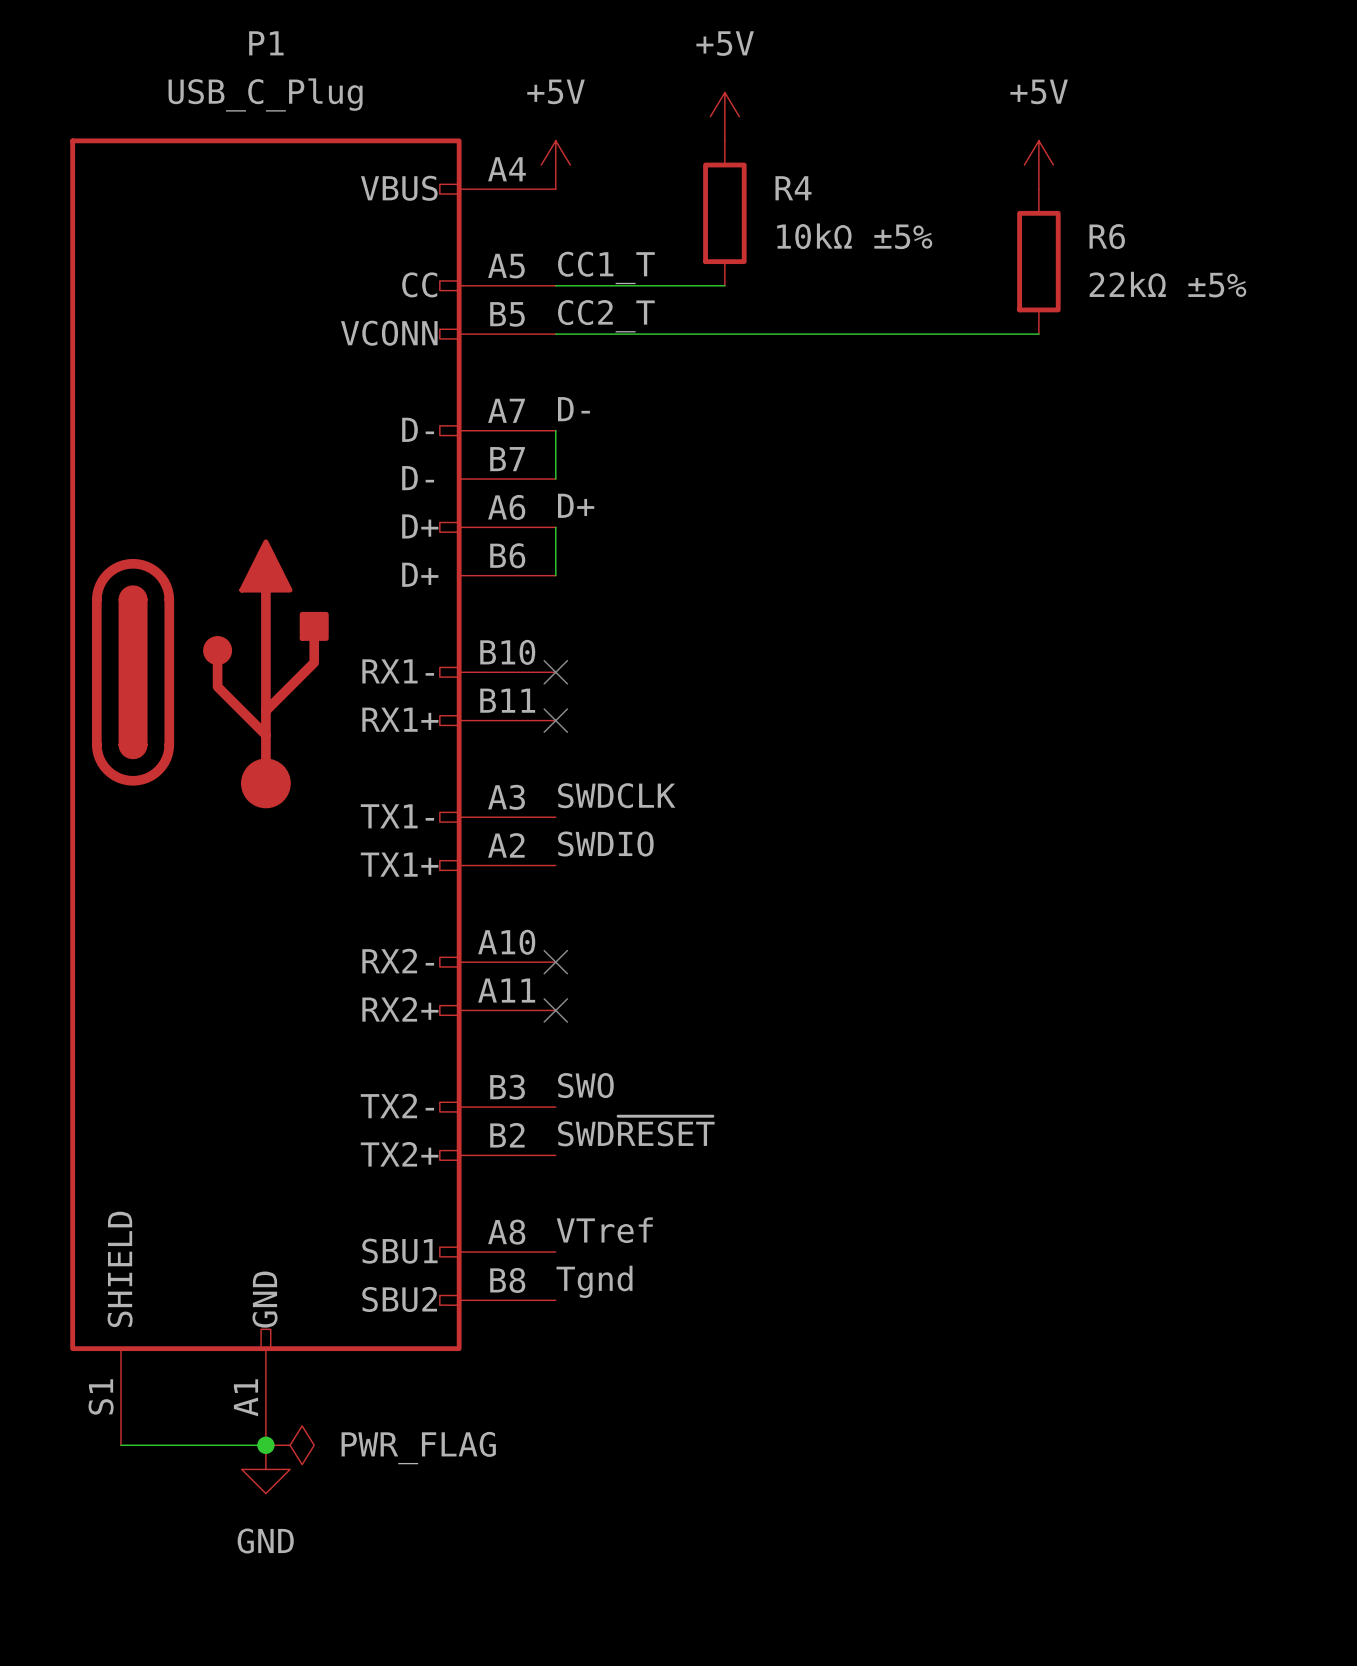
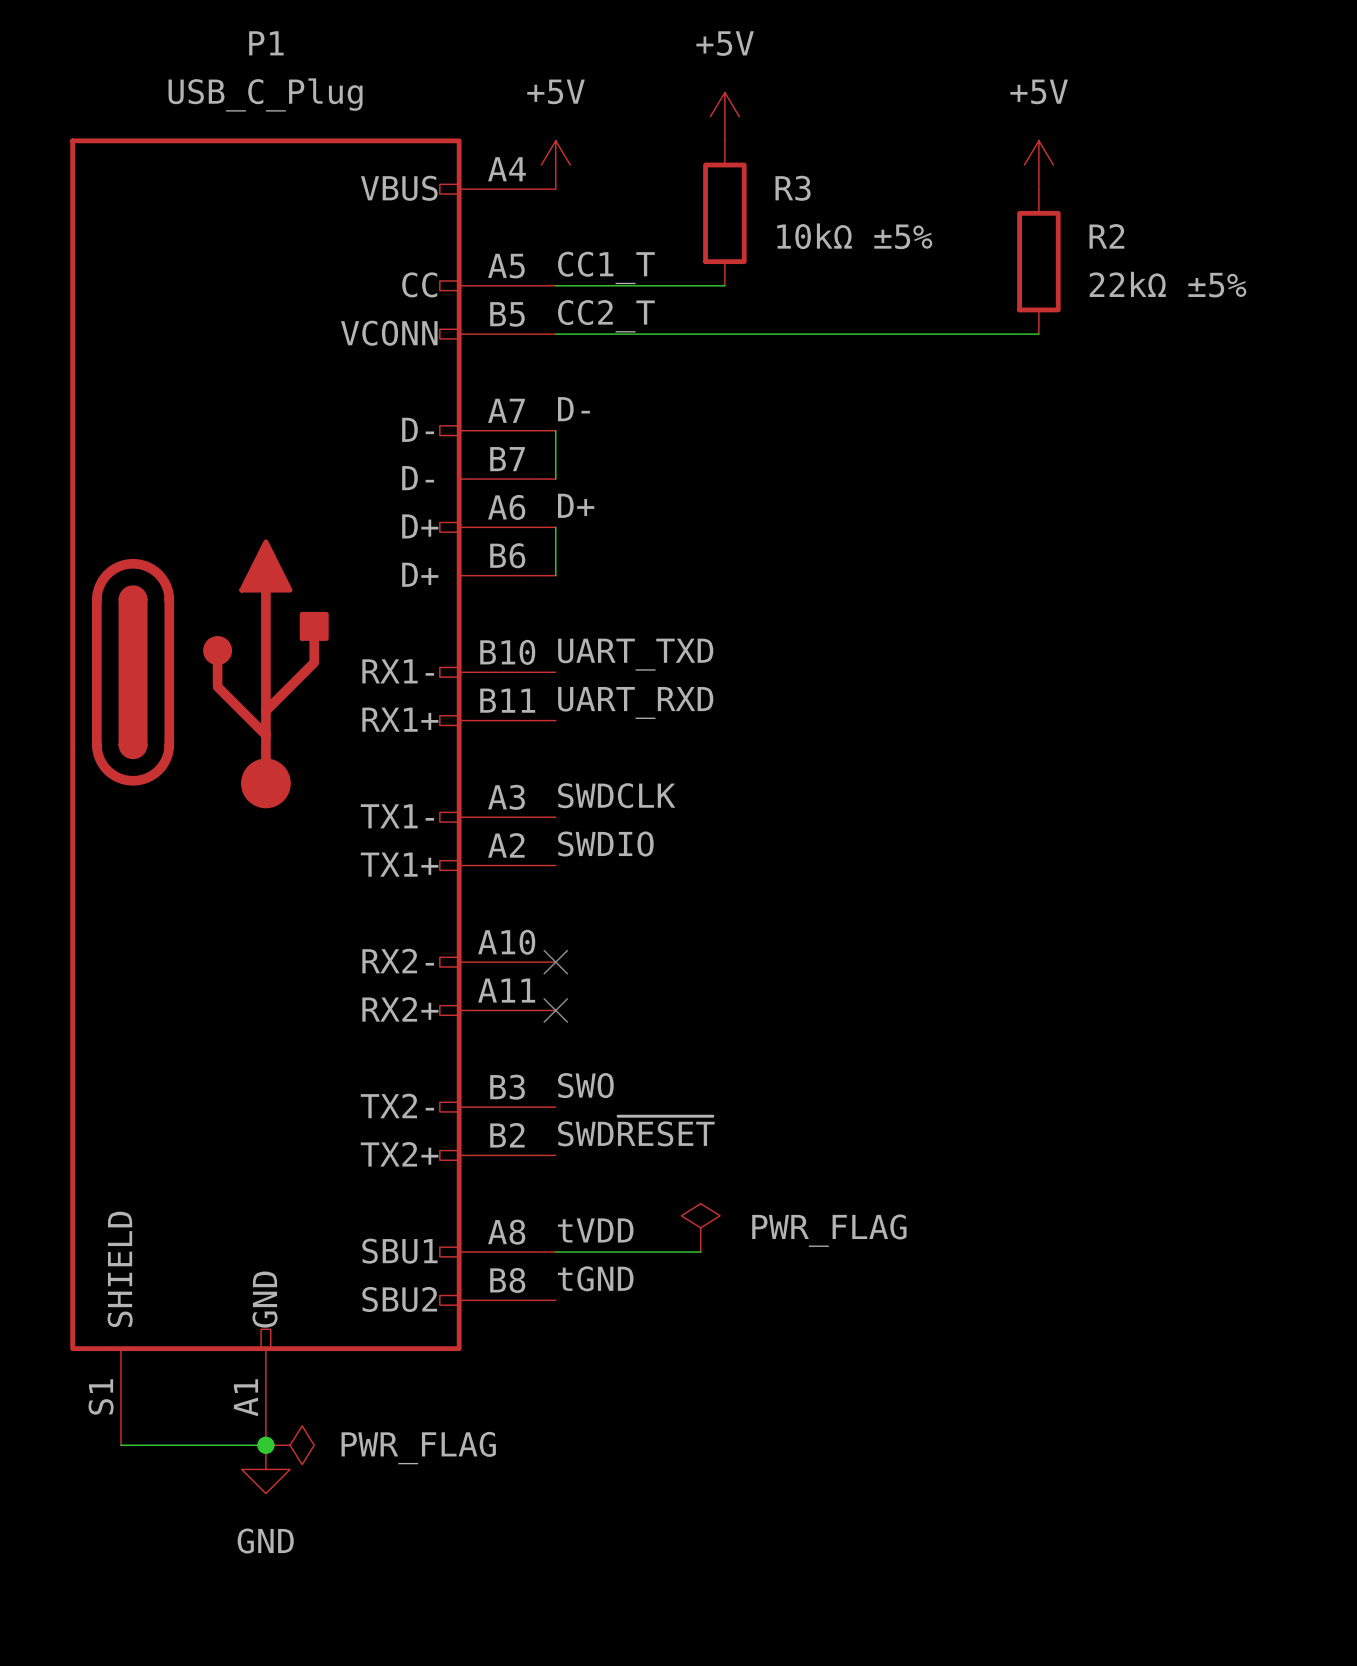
R4 name: R4 (793, 188) -> R3 (793, 188)
R6 name: R6 (1107, 236) -> R2 (1106, 236)
label: none -> UART_TXD (635, 654)
no-connect mark: (555, 672) -> none
label: none -> UART_RXD (635, 702)
no-connect mark: (555, 720) -> none
power symbol: none -> PWR_FLAG (700, 1227)
label: VTref (604, 1230) -> tVDD (595, 1230)
wire: none -> (555, 1252) (700, 1252)
label: Tgnd (594, 1281) -> tGND (595, 1278)

